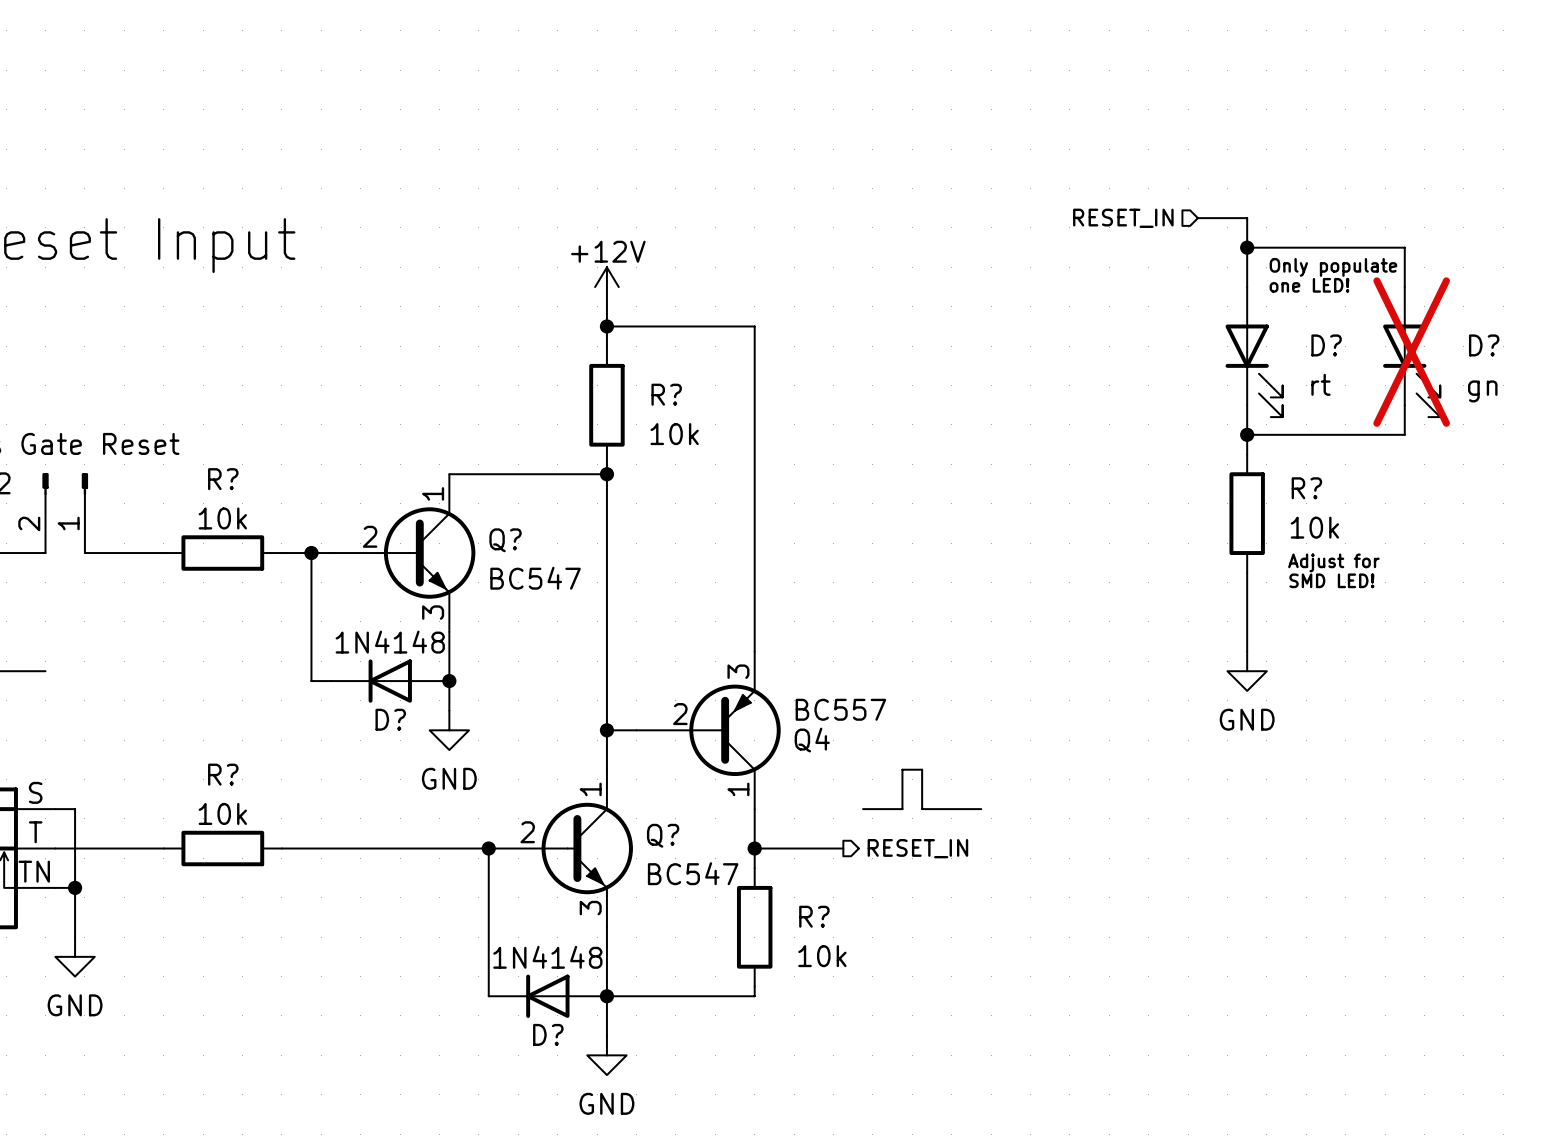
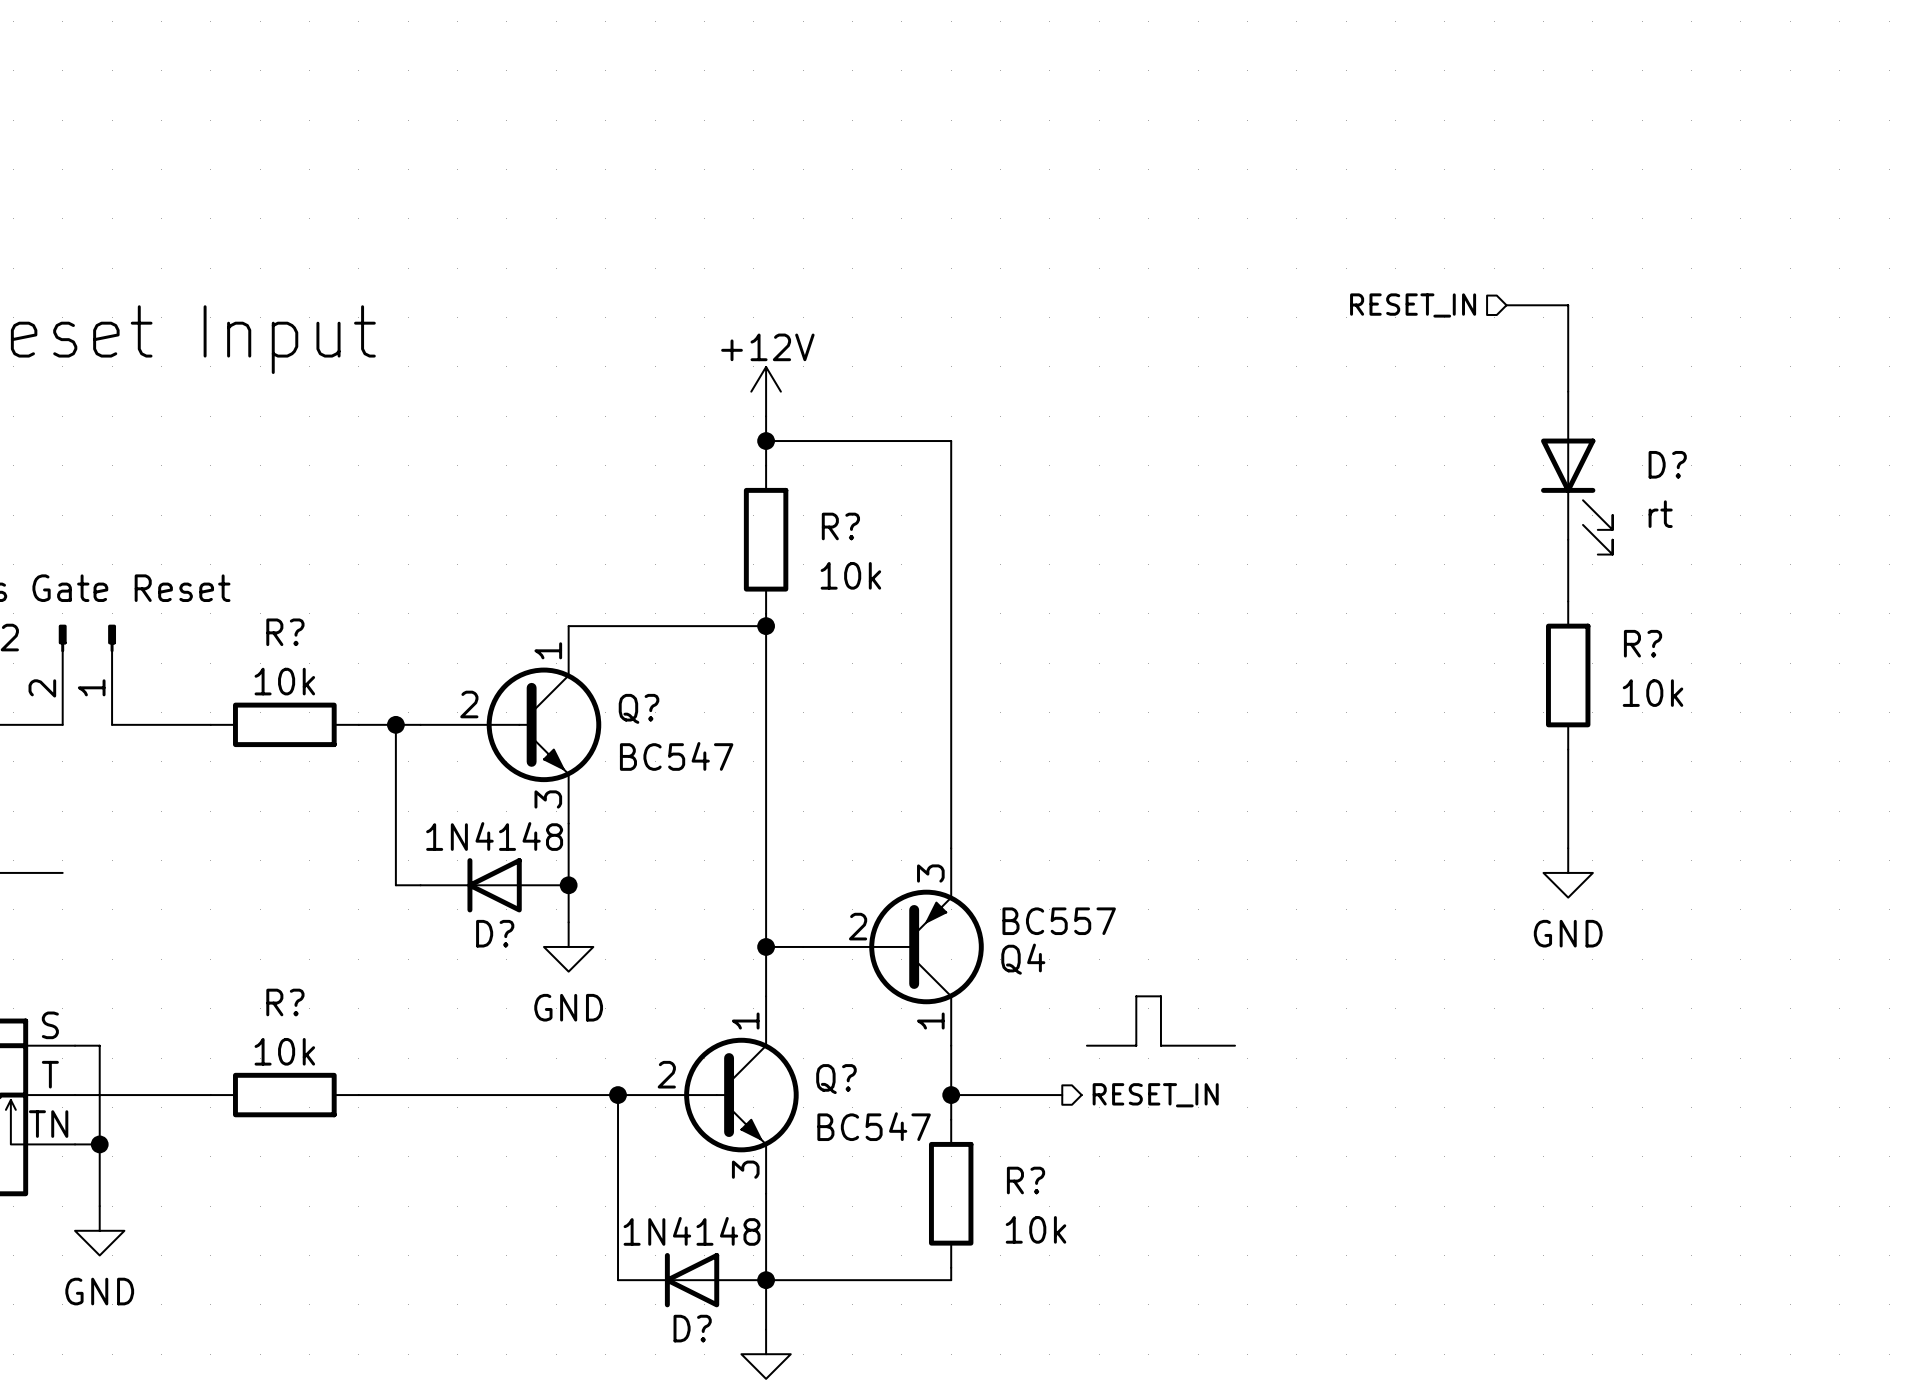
wire: (1247, 247) (1404, 247) (1404, 287) -> none
junction: (1247, 247) -> none
text: Only populate (1333, 267) -> none
text: one LED! (1309, 285) -> none
D?: gn (1411, 352) -> none
wire: (1404, 405) (1404, 434) (1247, 434) -> none
junction: (1247, 434) -> none
text: Adjust for (1333, 562) -> none
text: SMD LED! (1331, 580) -> none

